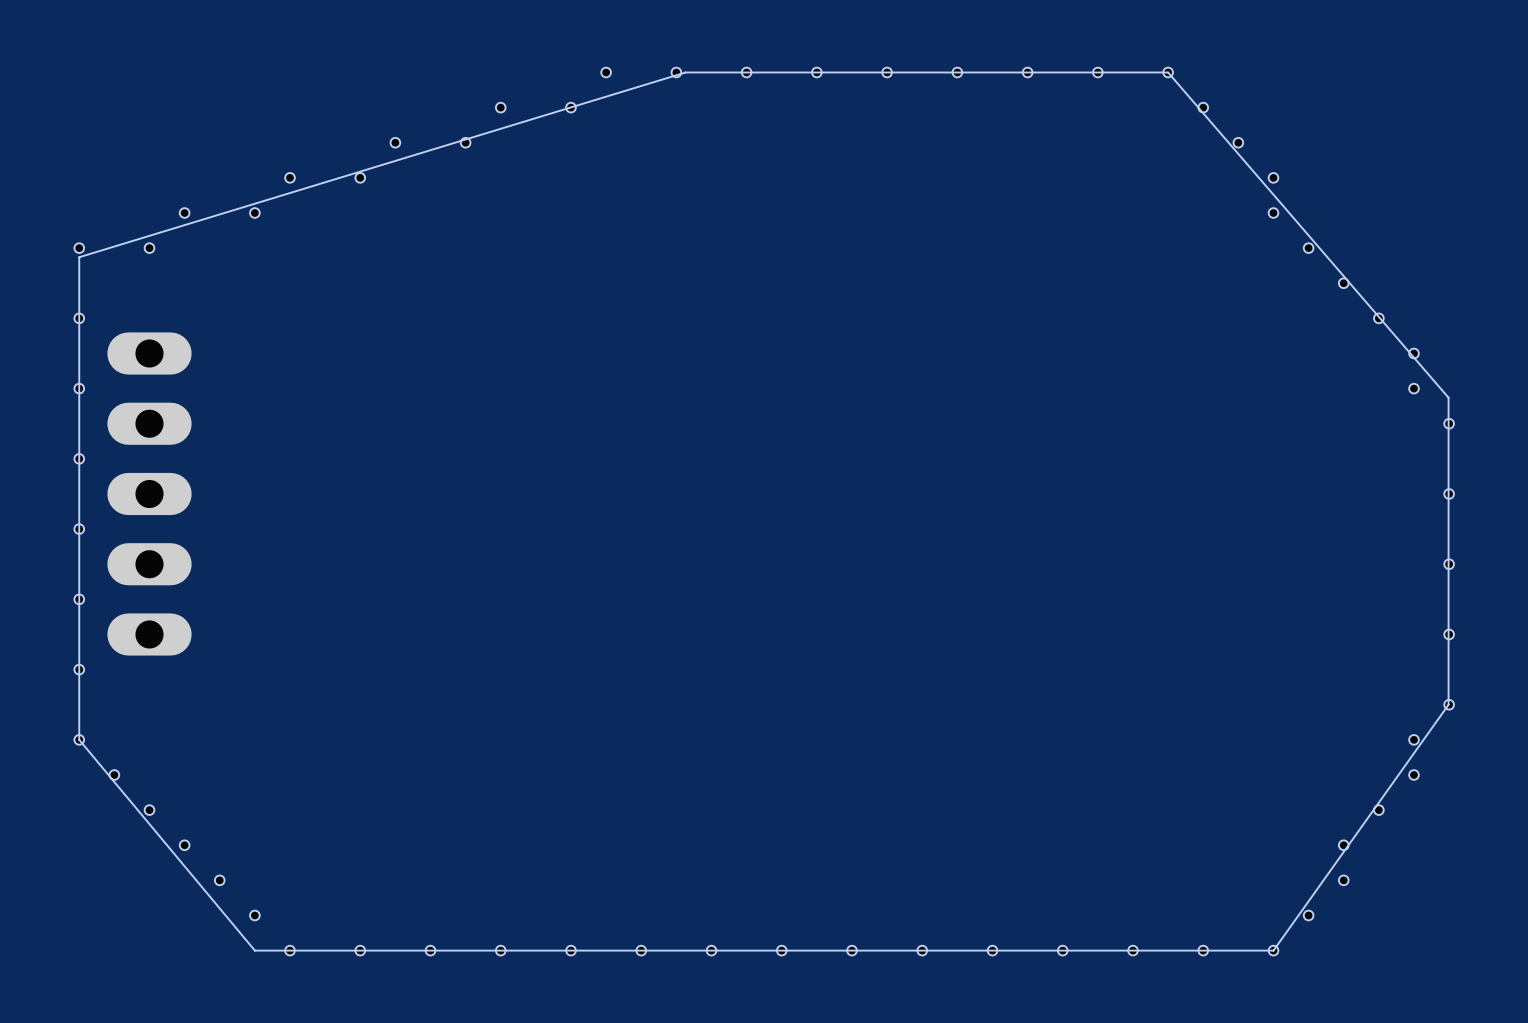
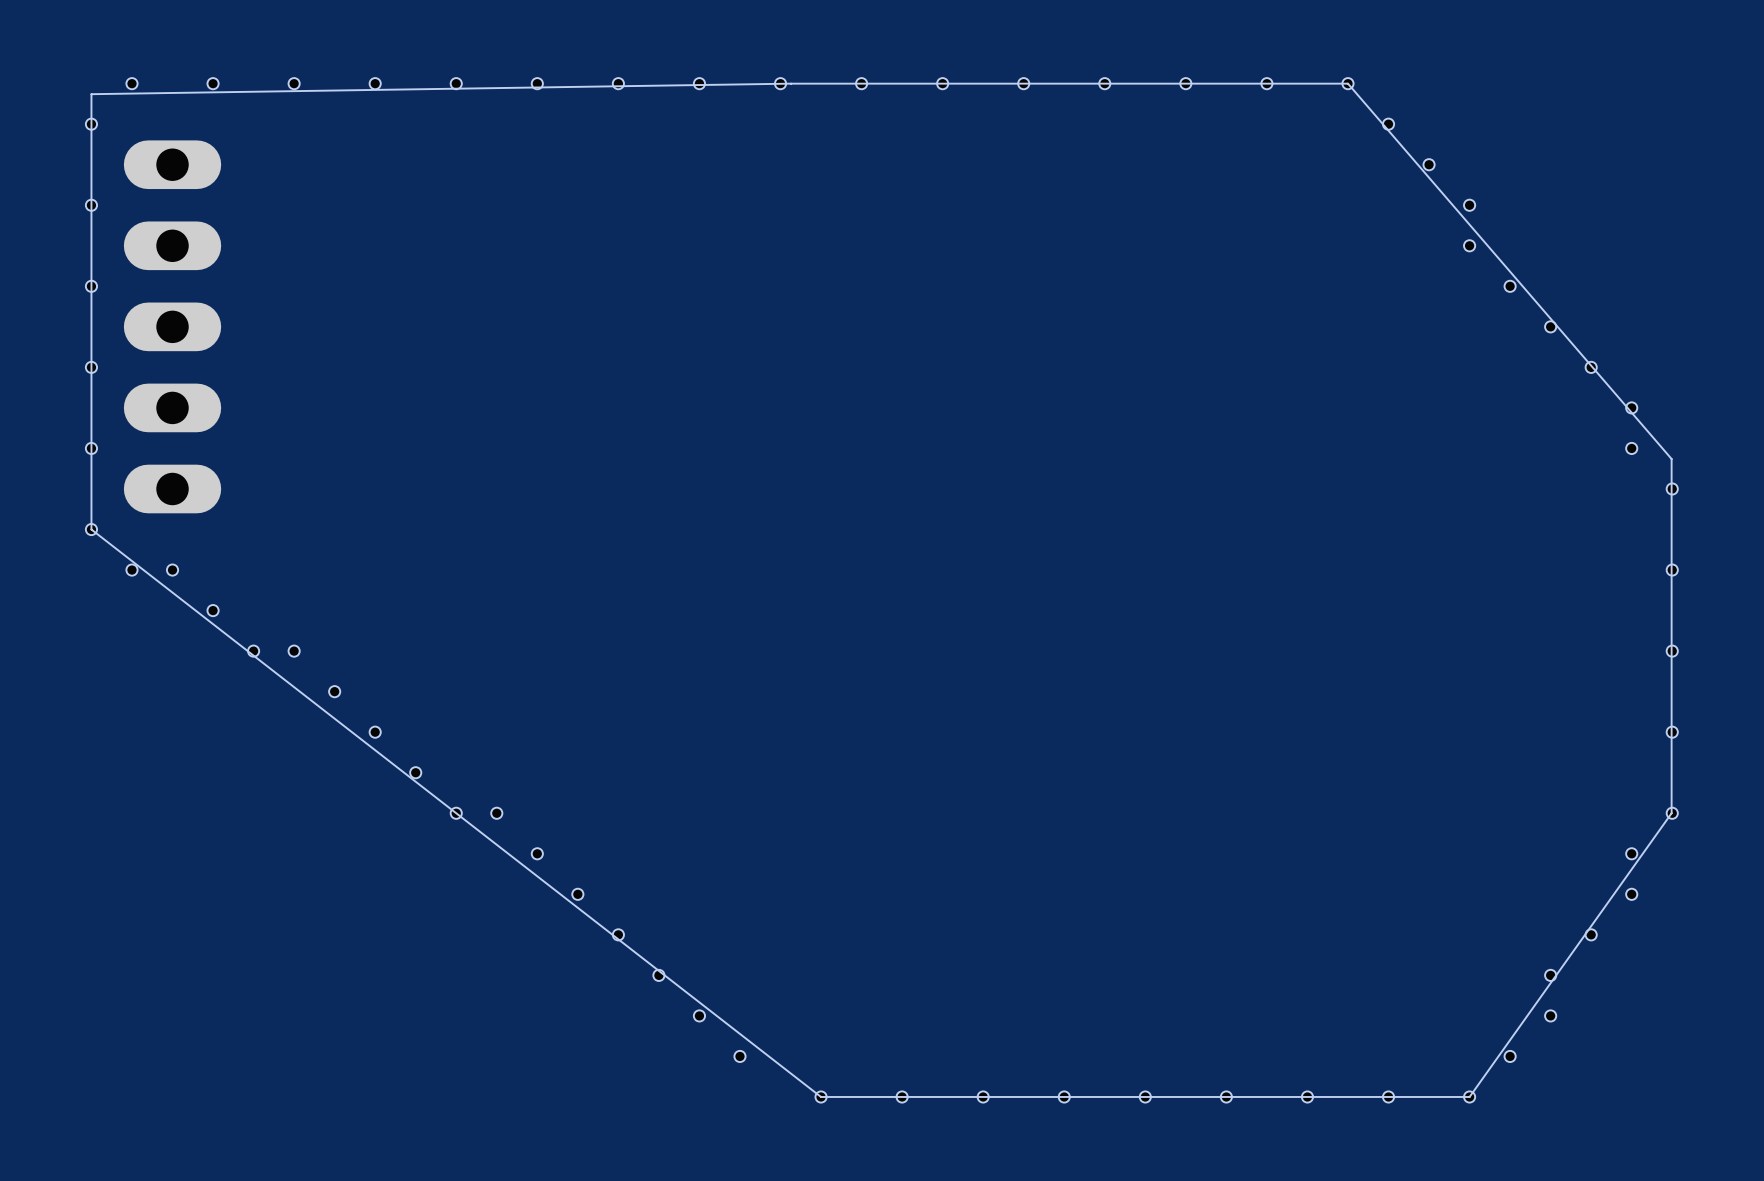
hole: none -> (131, 83)
hole: none -> (213, 83)
hole: none -> (294, 83)
hole: none -> (375, 83)
hole: none -> (456, 83)
hole: none -> (537, 83)
hole: none -> (618, 83)
board edge: (685, 72) (79, 257) -> (791, 83) (91, 94) (91, 296)
hole: none -> (91, 124)
hole: (500, 107) -> none
hole: (571, 107) -> none
hole: (395, 142) -> none
hole: (465, 142) -> none
hole: none -> (91, 205)
hole: (290, 177) -> none
hole: (360, 177) -> none
hole: (184, 212) -> none
hole: (254, 212) -> none
hole: (149, 248) -> none
board edge: (79, 458) (79, 739) (254, 950) (711, 950) -> (91, 529) (821, 1096)
hole: none -> (131, 570)
hole: none -> (172, 570)
part position: (149, 493) -> (172, 326)
hole: (79, 529) -> none
hole: none -> (213, 610)
hole: none -> (253, 651)
hole: none -> (294, 651)
hole: (79, 599) -> none
hole: none -> (334, 691)
hole: none -> (375, 732)
hole: (79, 669) -> none
hole: none -> (415, 772)
hole: none -> (456, 813)
hole: none -> (496, 813)
hole: (79, 739) -> none
hole: none -> (537, 853)
hole: (114, 774) -> none
hole: none -> (577, 894)
hole: (149, 810) -> none
hole: none -> (618, 934)
hole: (184, 845) -> none
hole: none -> (658, 975)
hole: (219, 880) -> none
hole: none -> (699, 1015)
hole: (254, 915) -> none
hole: (290, 950) -> none
hole: (360, 950) -> none
hole: (430, 950) -> none
hole: (500, 950) -> none
hole: (571, 950) -> none
hole position: (641, 950) -> (739, 1056)

